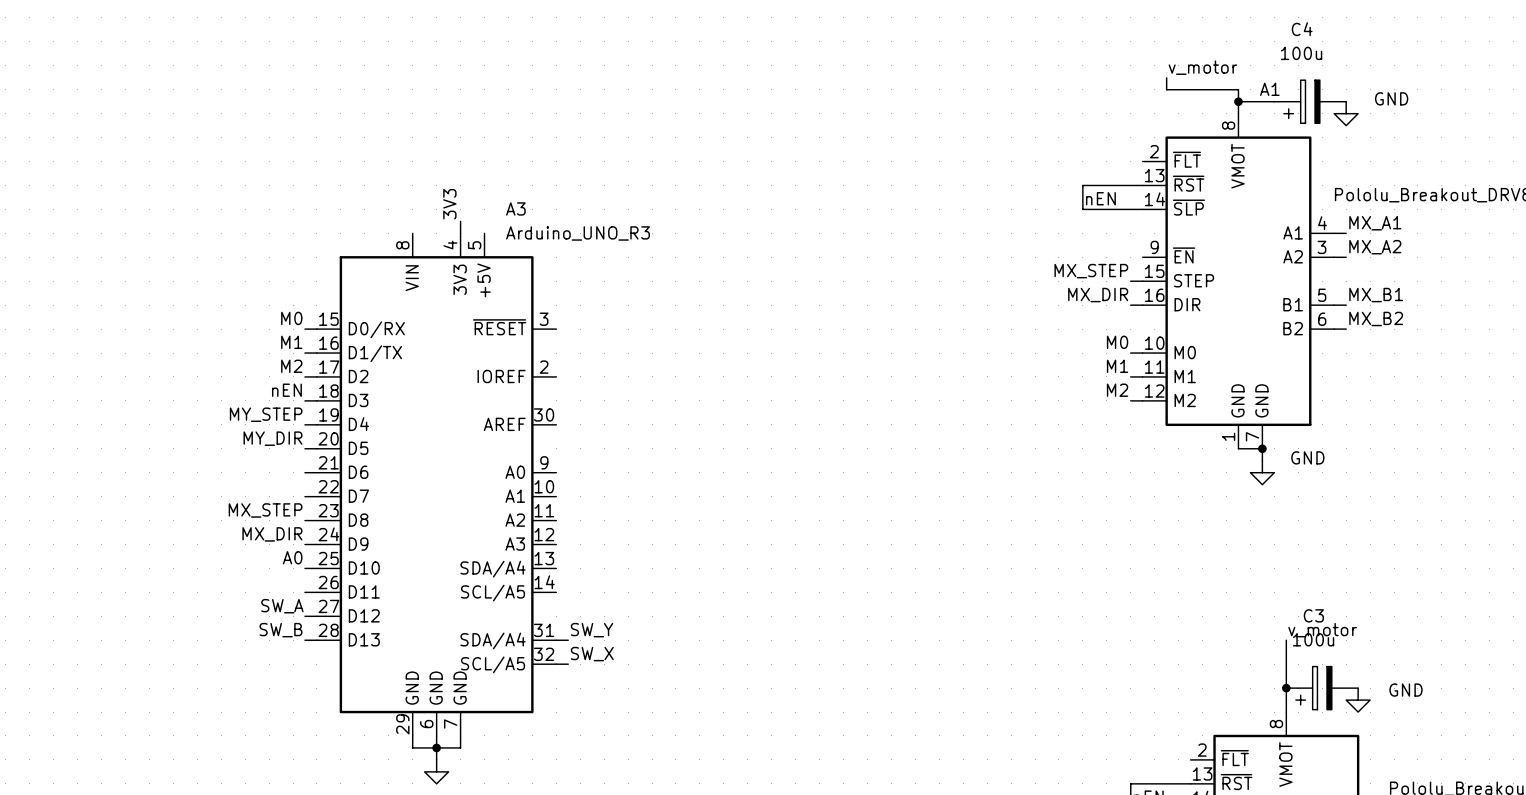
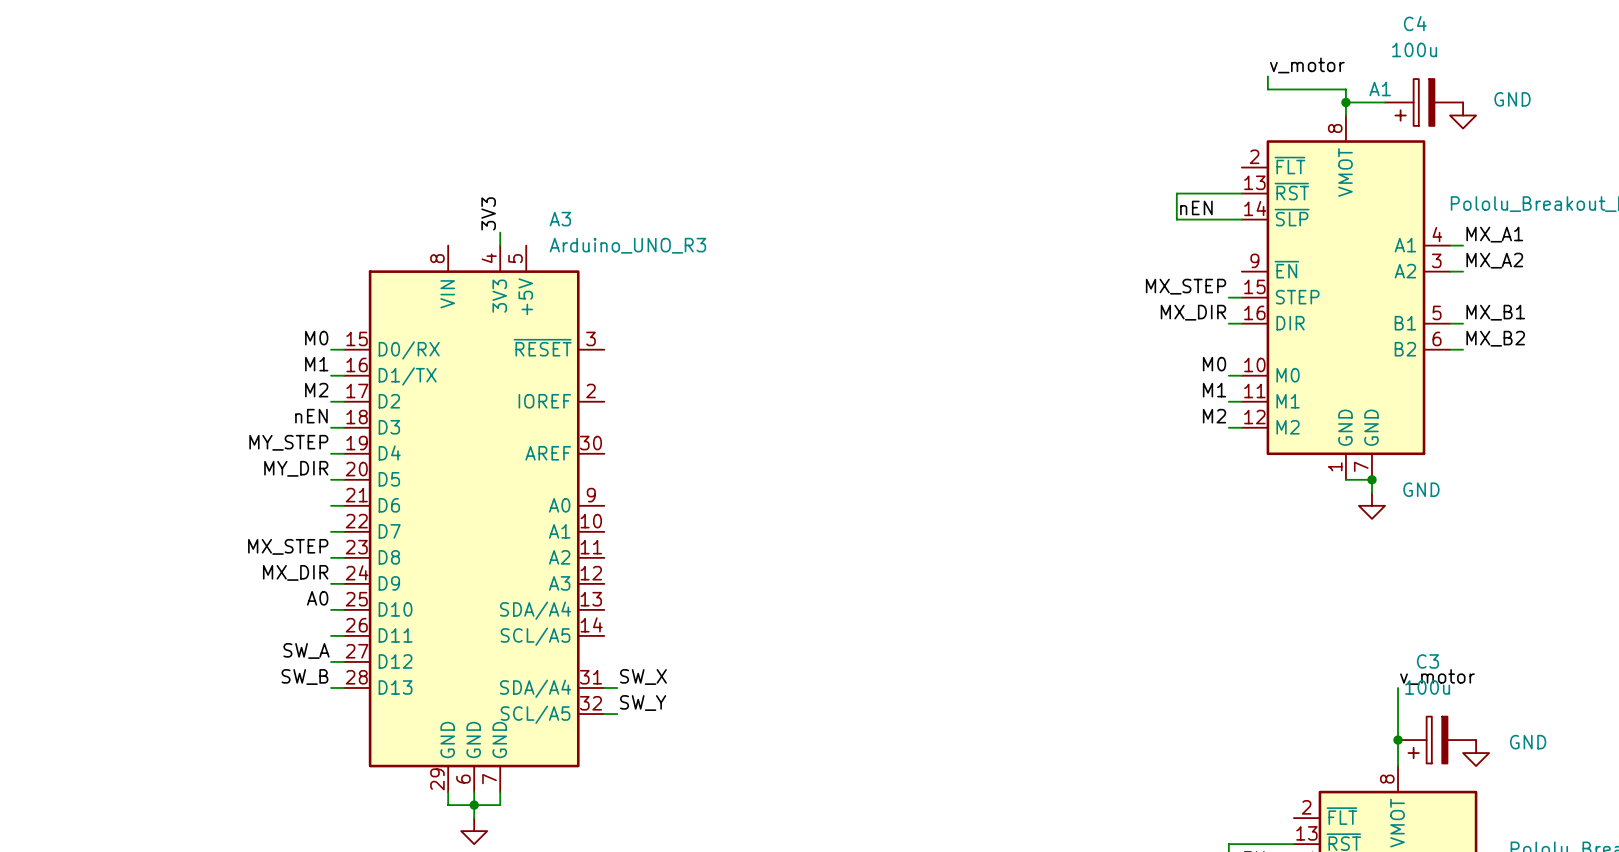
label: SW_Y (592, 630) -> SW_X (643, 677)
label: SW_X (592, 654) -> SW_Y (643, 703)

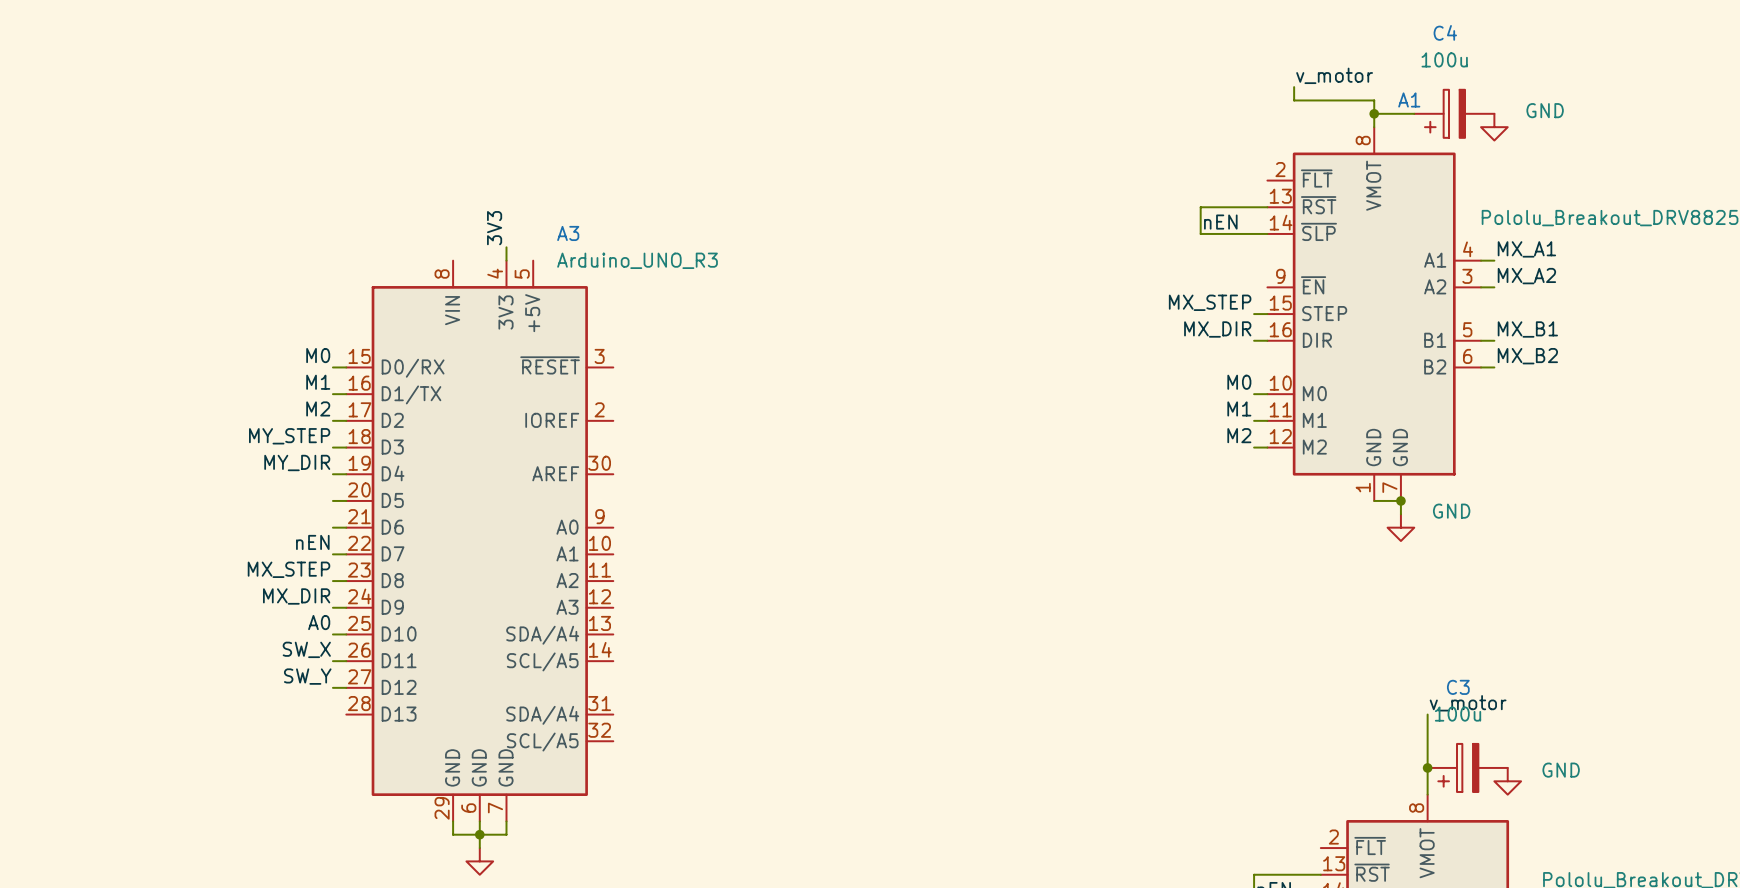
label: nEN (311, 416) -> MY_STEP (289, 436)
label: MY_STEP (288, 442) -> MY_DIR (297, 462)
label: MY_DIR (296, 468) -> none
label: none -> nEN (312, 542)
label: none -> SW_X (306, 649)
label: SW_A (306, 650) -> SW_Y (307, 676)
label: SW_B (304, 677) -> none
label: SW_X (643, 677) -> none
wire: (331, 687) (344, 687) -> none
wire: (604, 687) (617, 687) -> none
label: SW_Y (643, 703) -> none
wire: (604, 714) (617, 714) -> none

